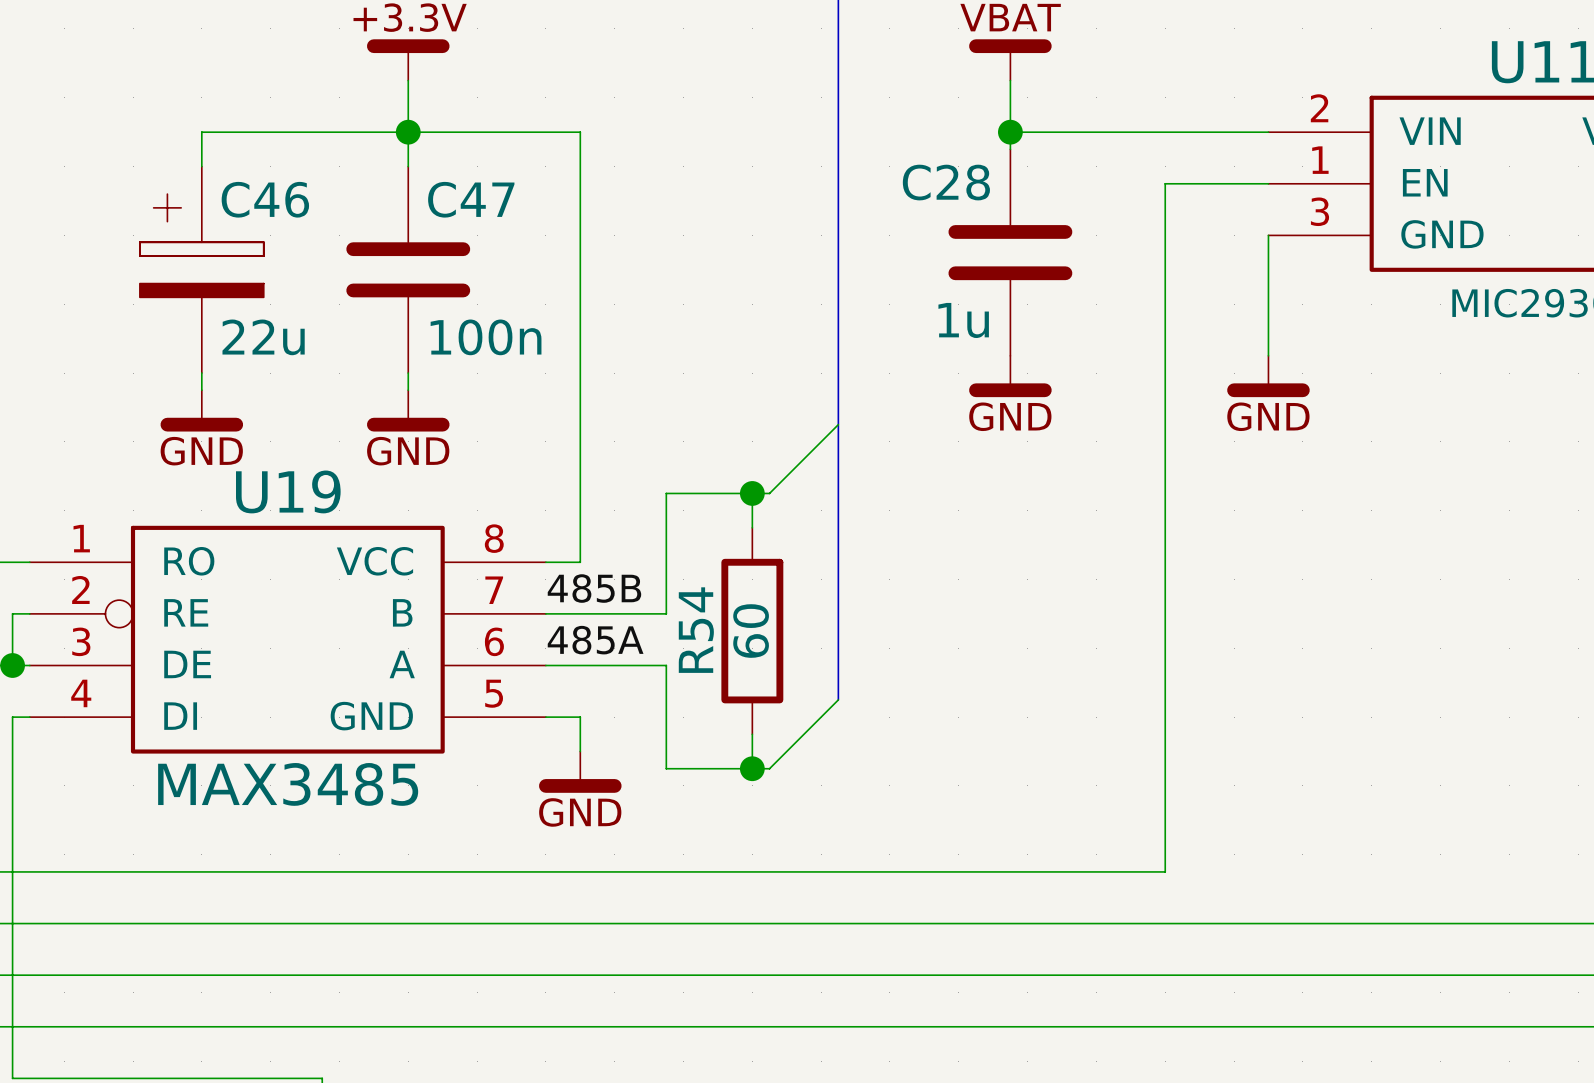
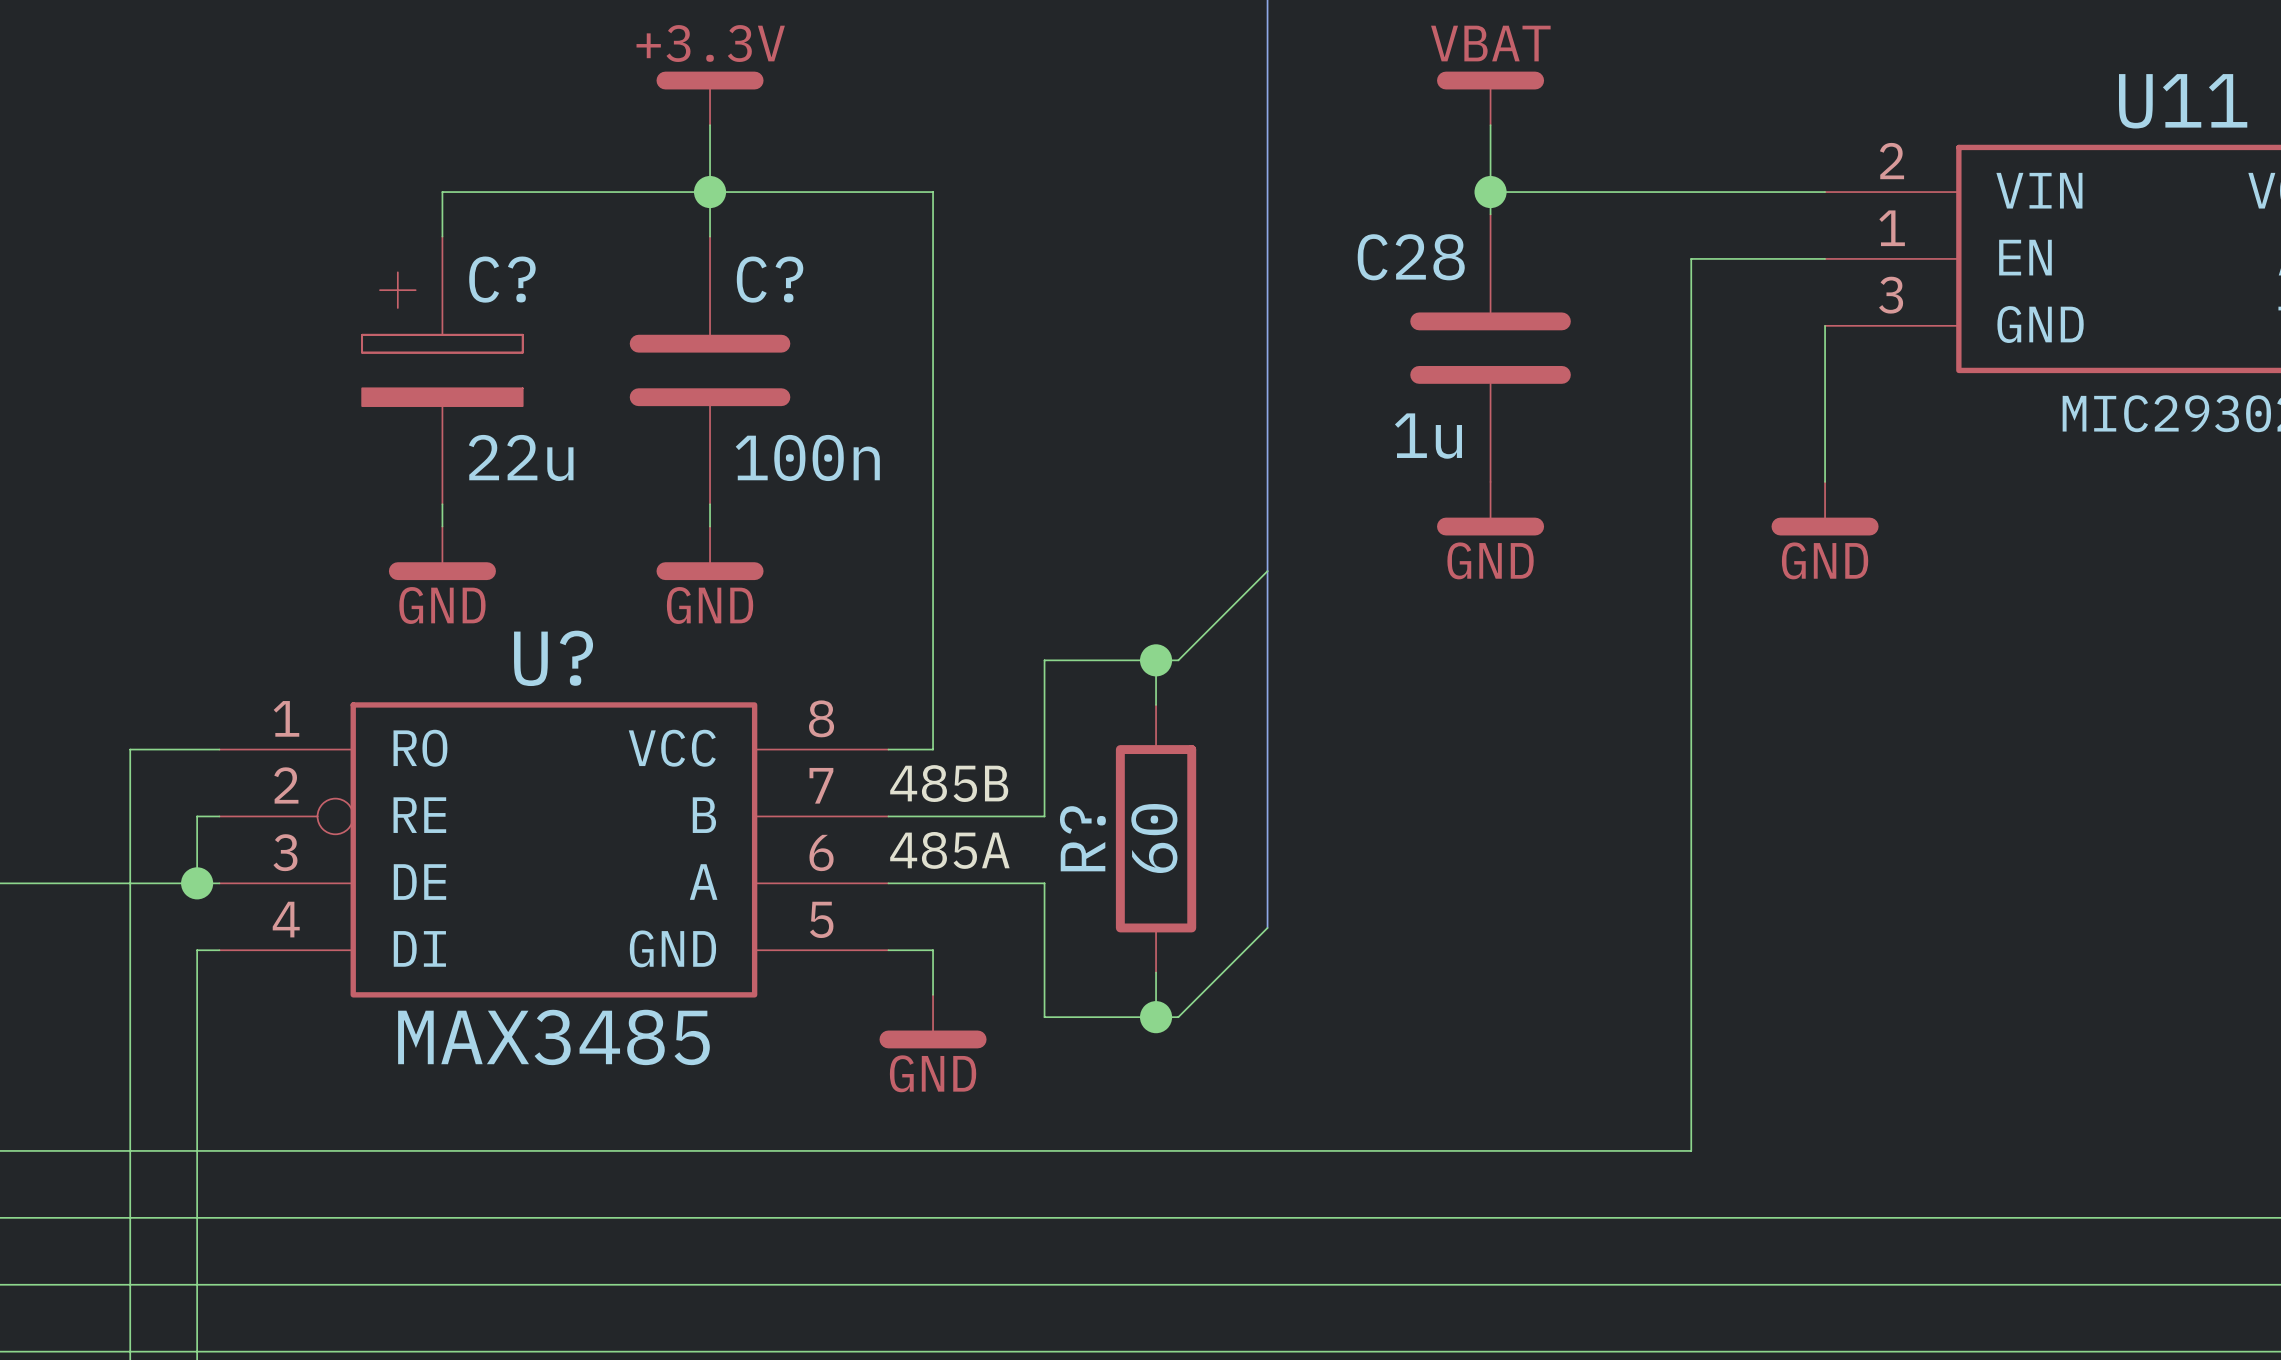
C46 name: C46 (265, 199) -> C? (502, 279)
C47 name: C47 (471, 199) -> C? (770, 279)
U19 name: U19 (288, 491) -> U? (553, 658)
R54 name: R54 (696, 630) -> R? (1082, 838)

